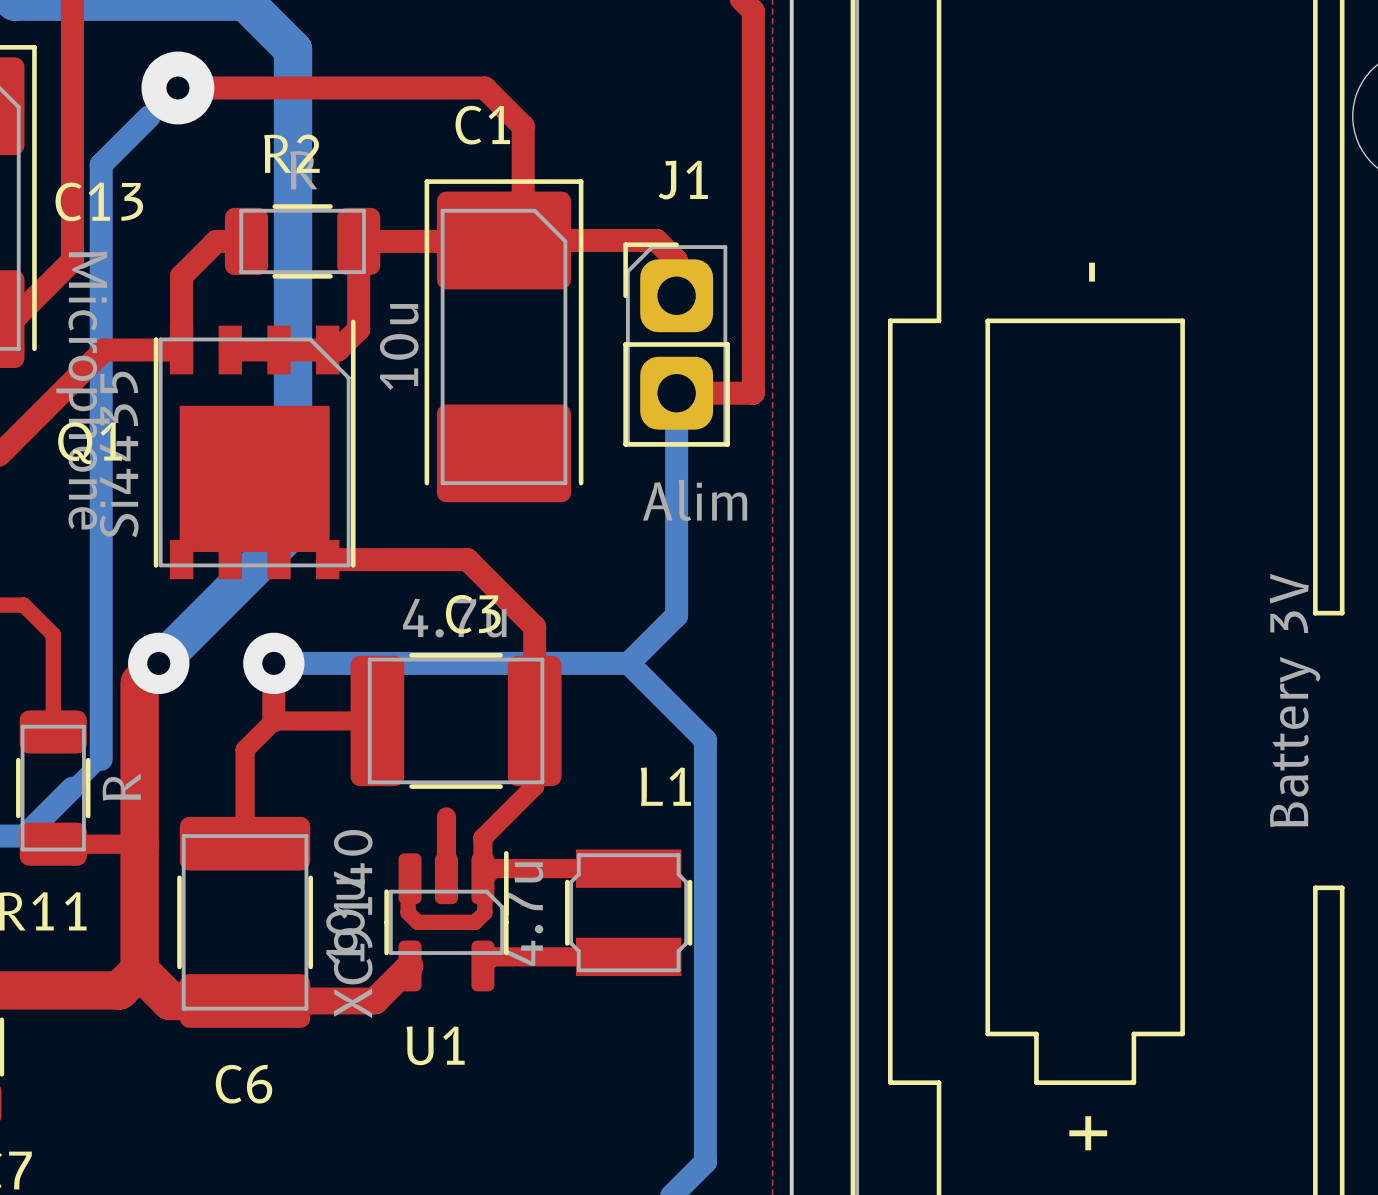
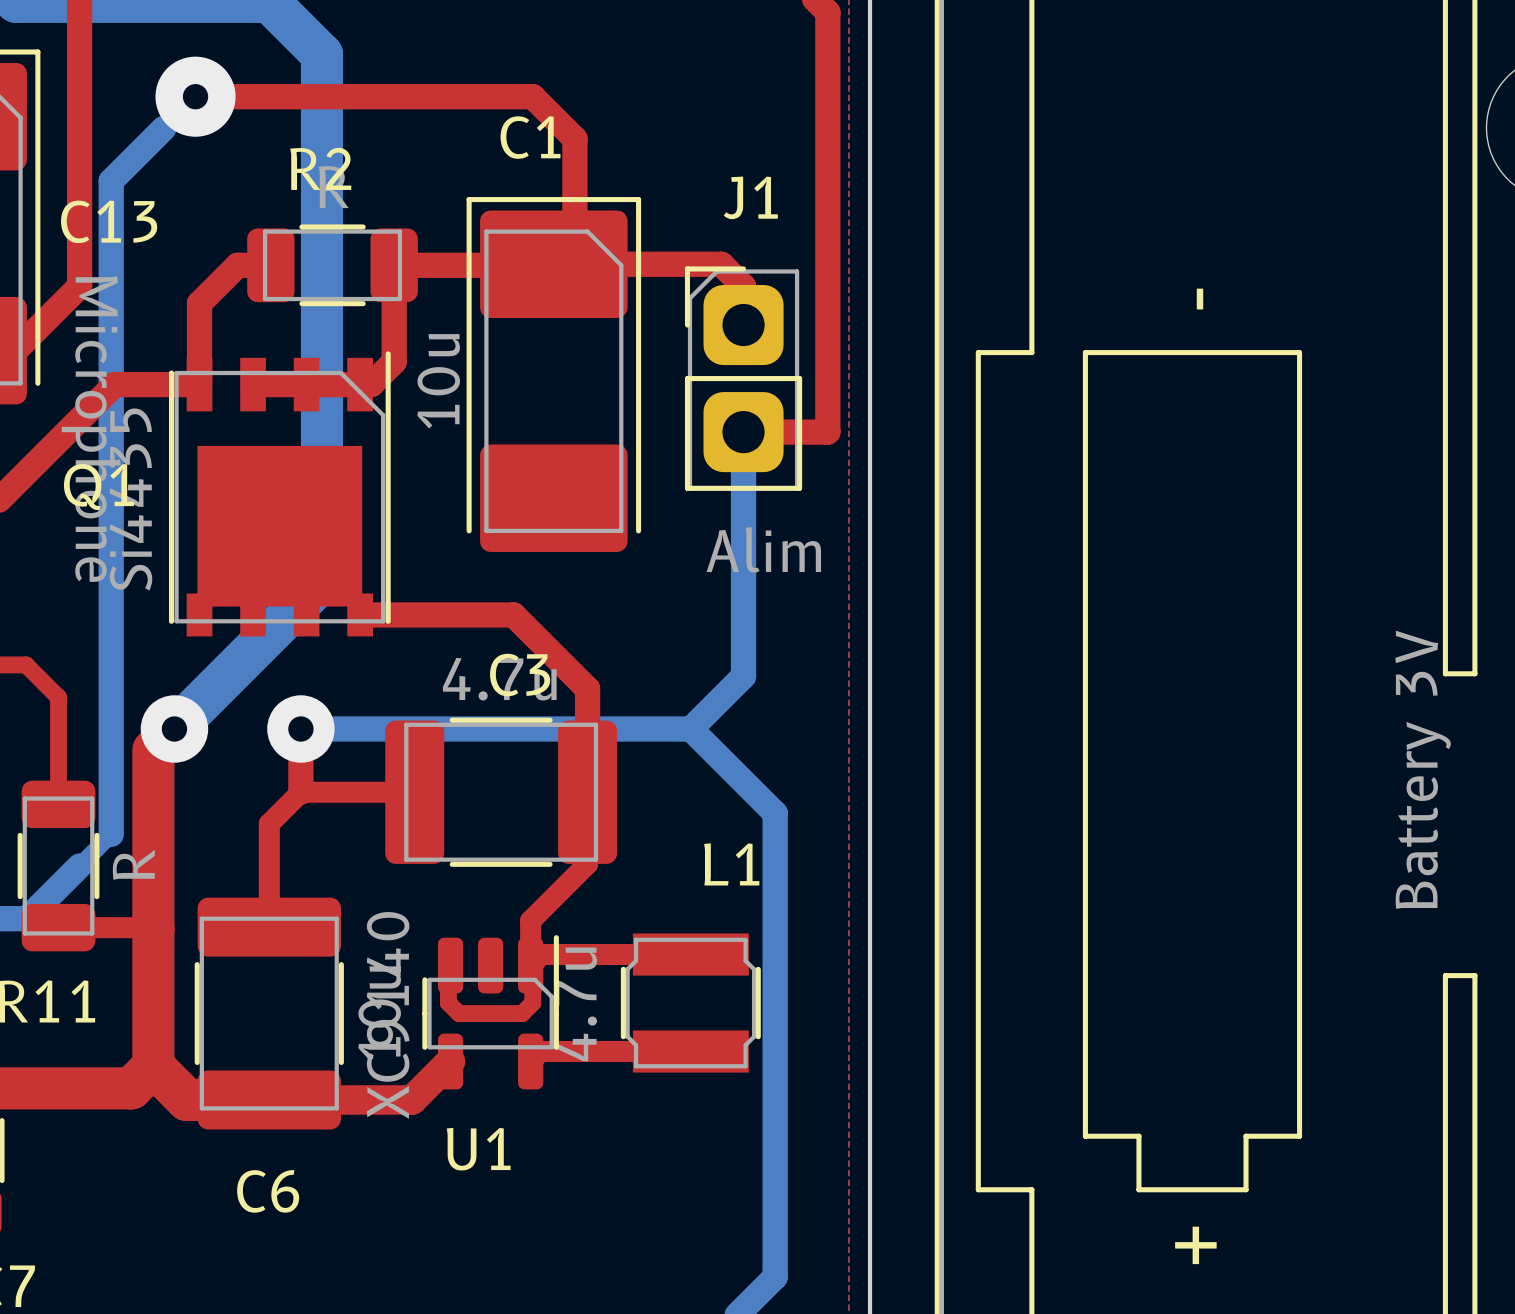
top track: (446, 816) (446, 878) -> none

